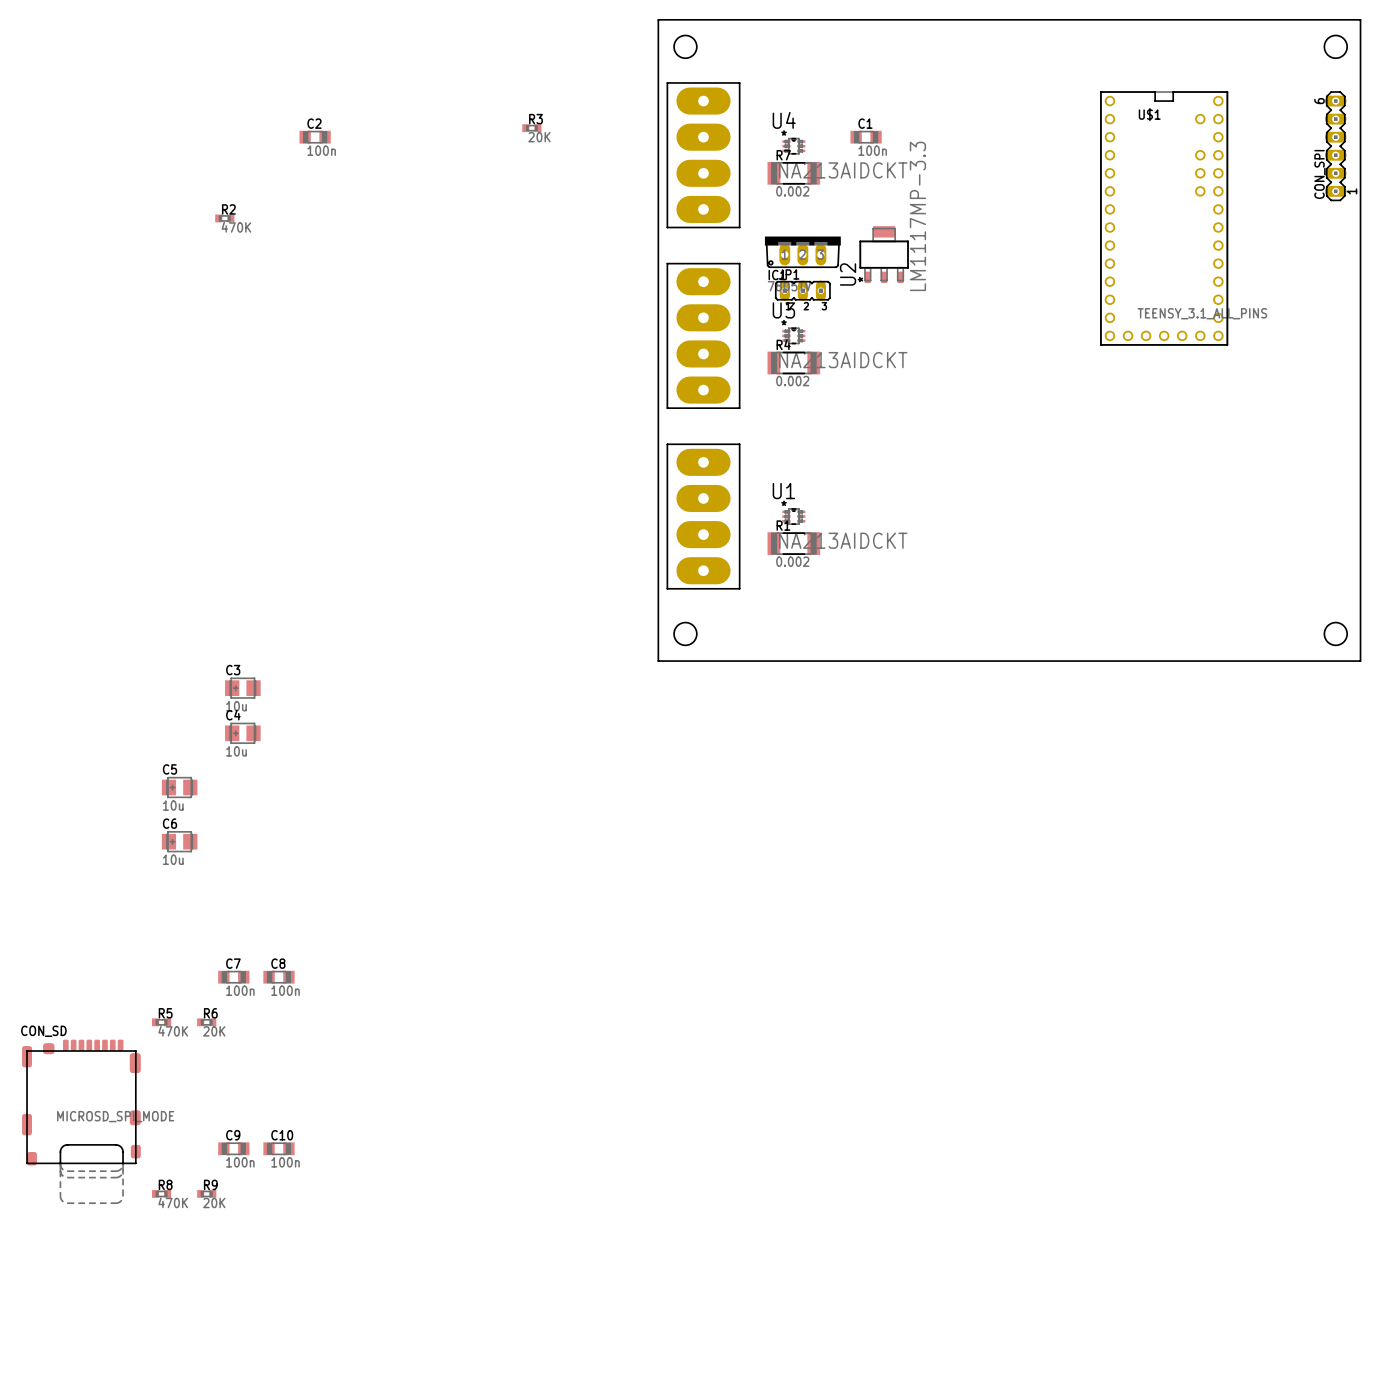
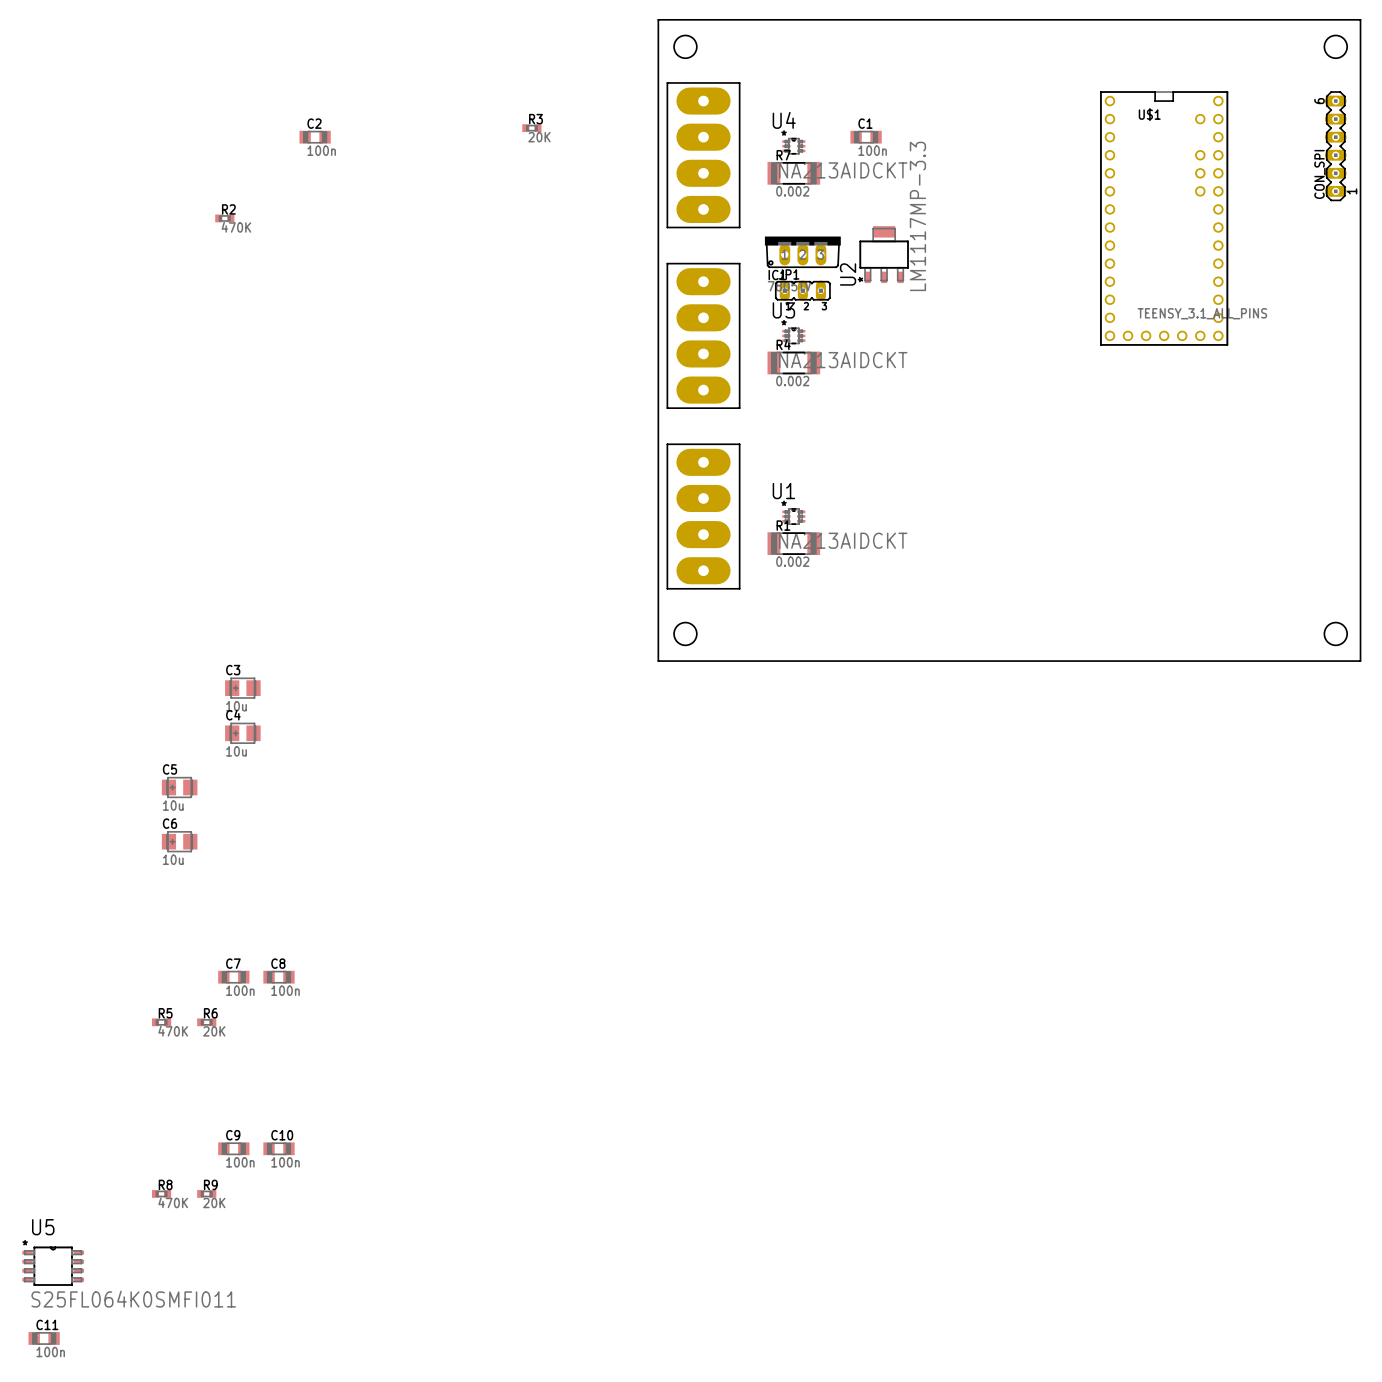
CON_SD: MICROSD_SPI_MODE (81, 1121) -> none
U5: none -> S25FL064K0SMFI011 (53, 1266)
C11: none -> 100n (44, 1338)

